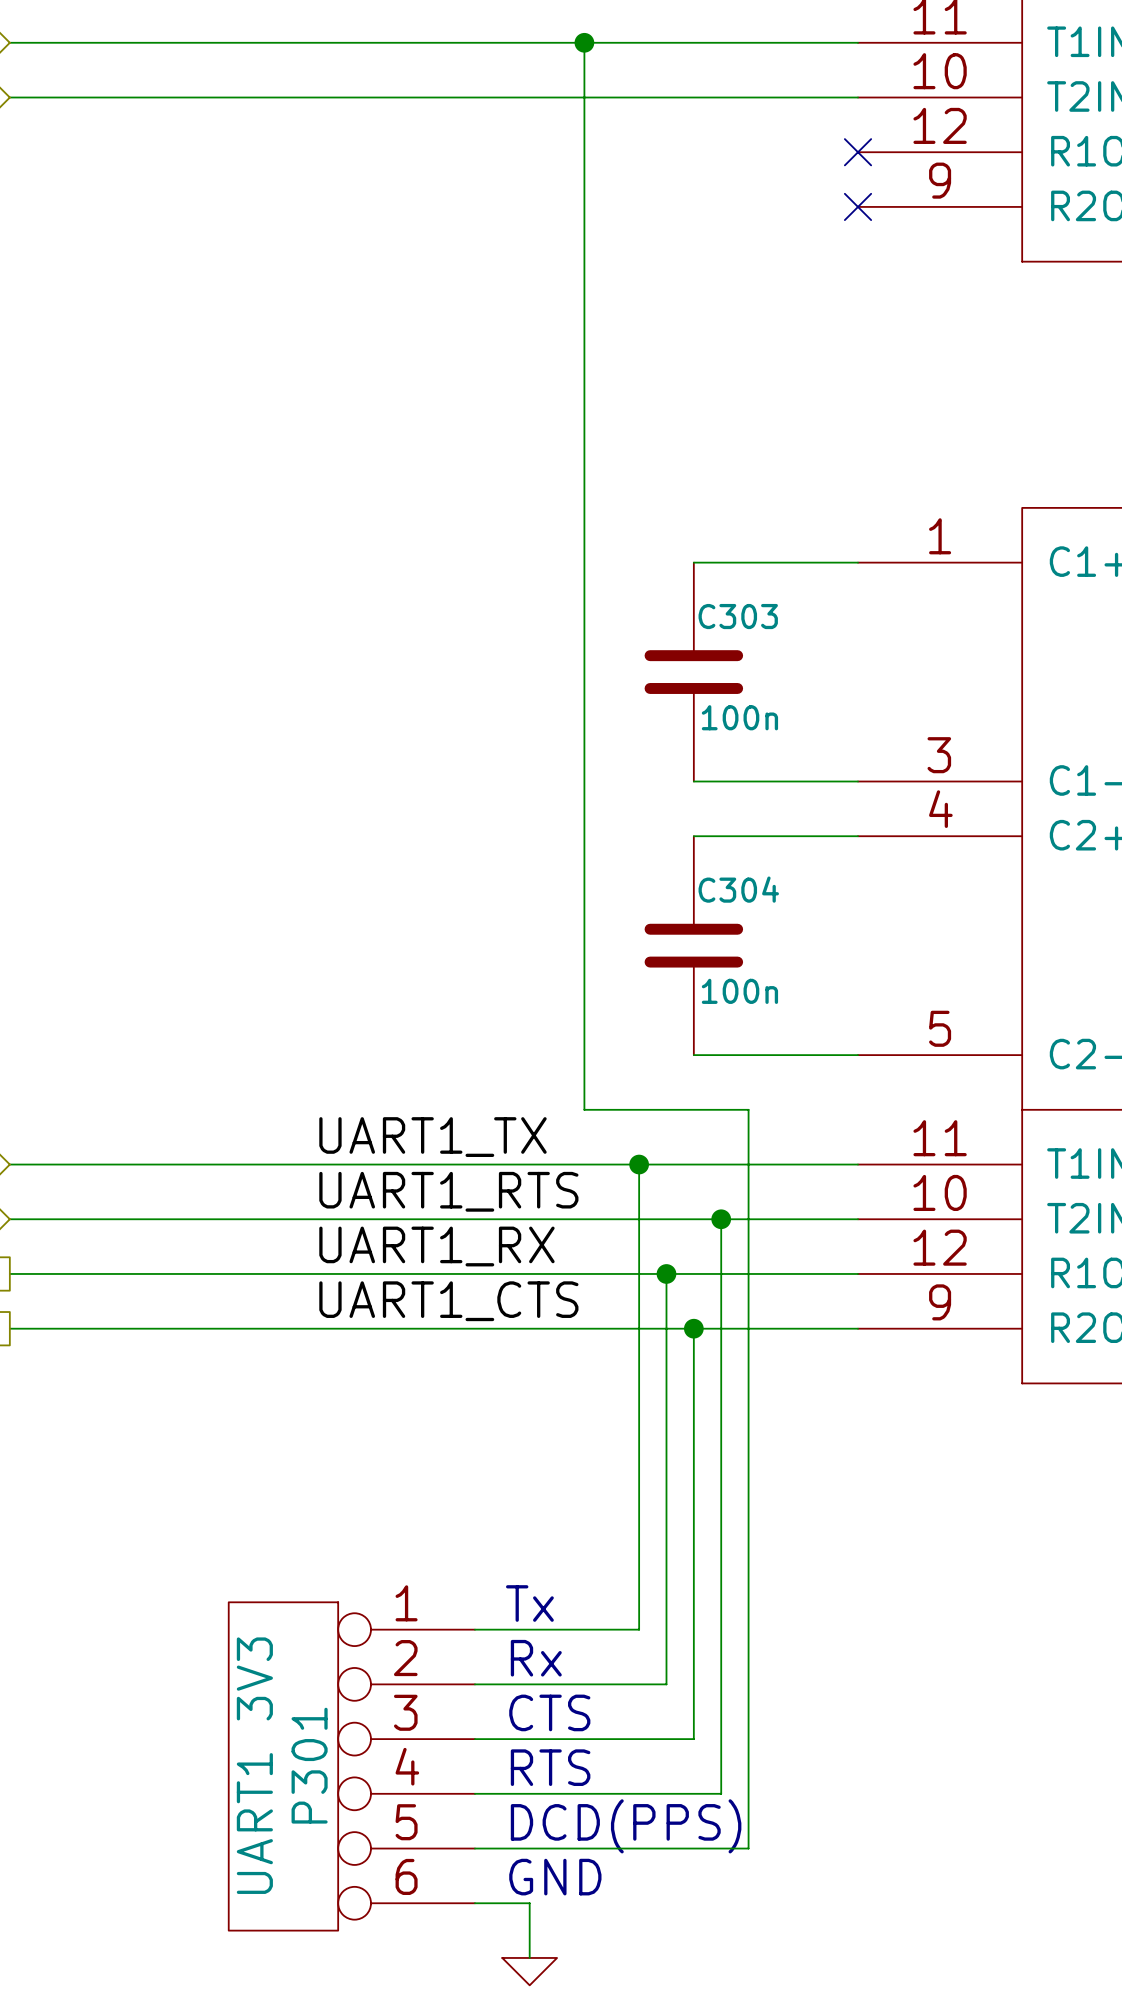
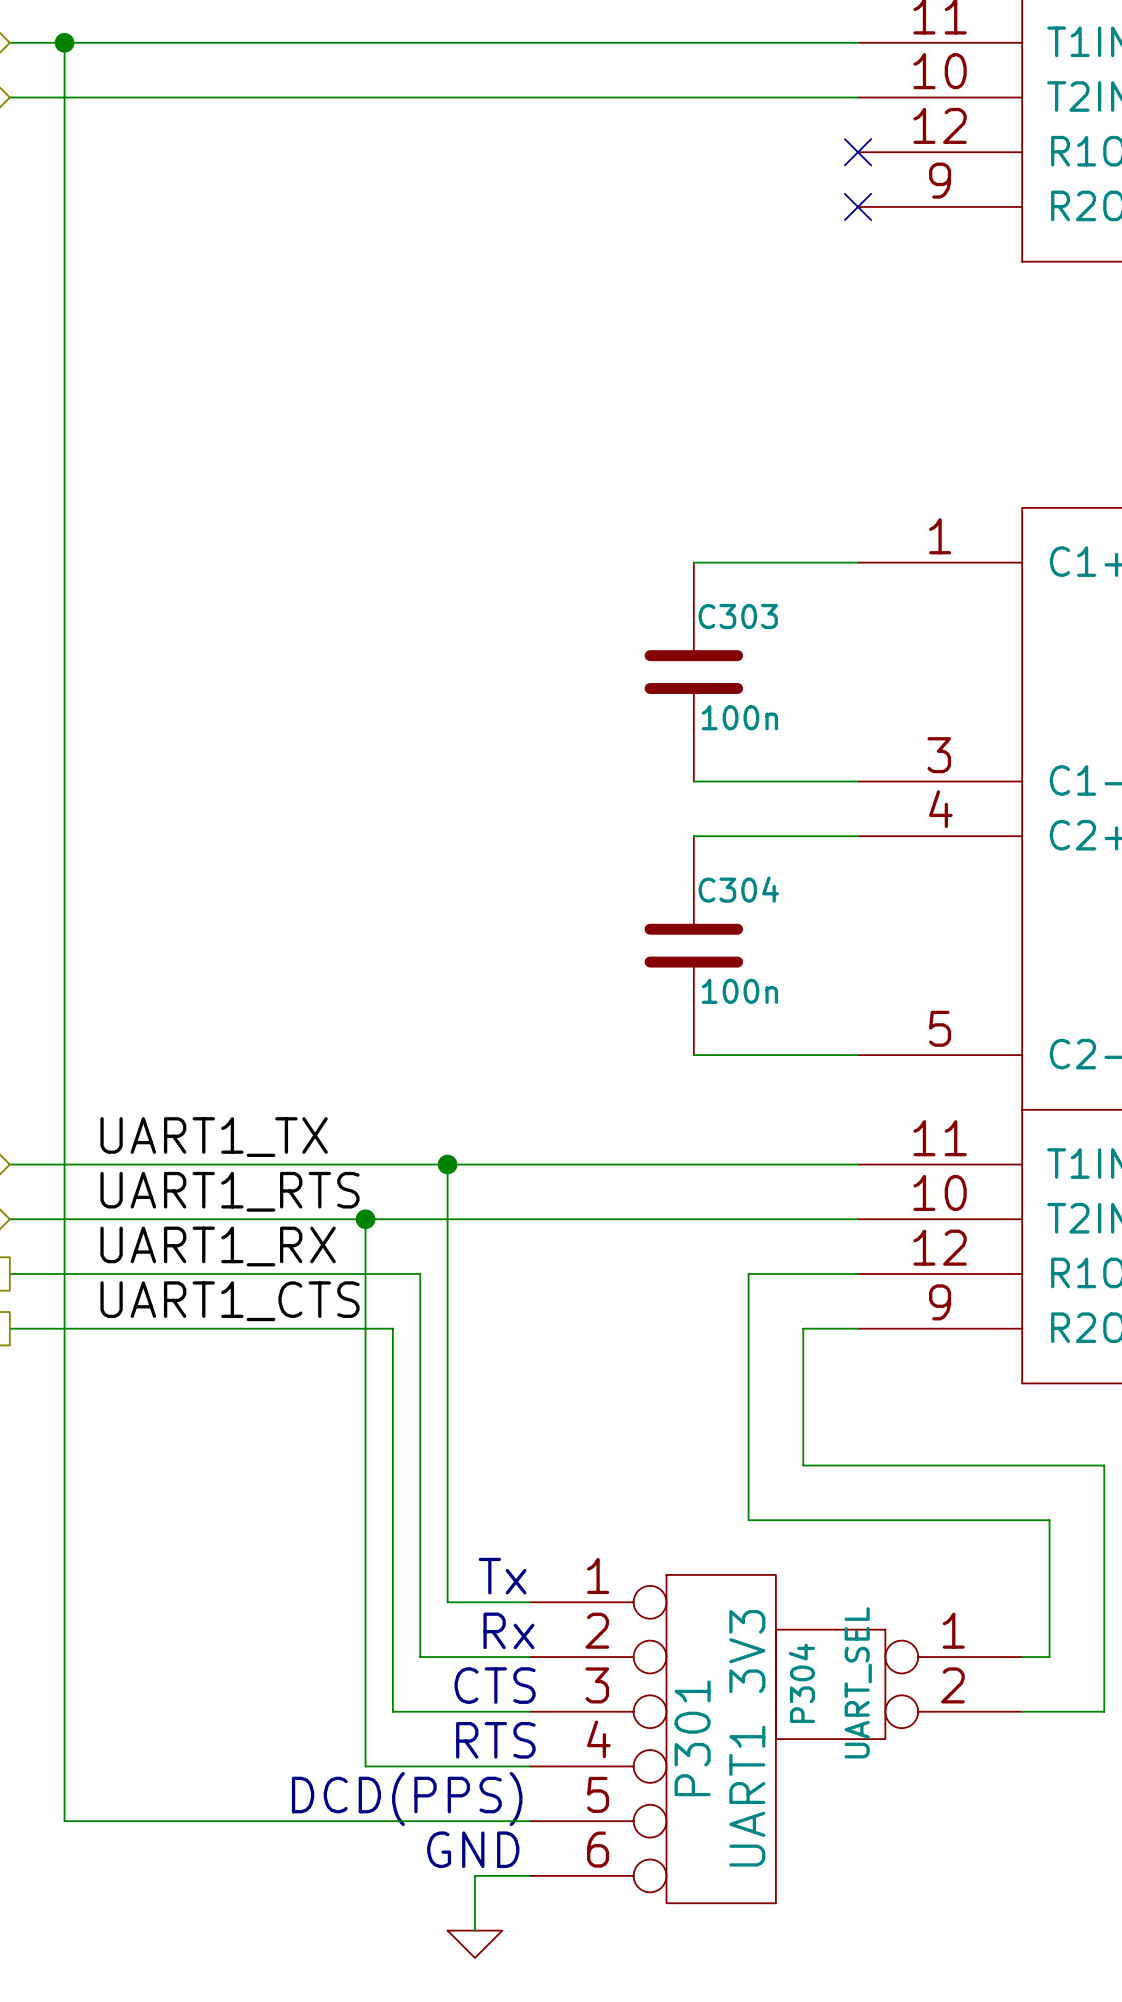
wire: none -> (64, 42) (64, 1821) (529, 1821)
junction: none -> (64, 42)
wire: (584, 42) (584, 1109) (748, 1109) (748, 1273) (420, 1273) -> (529, 1657) (420, 1657) (420, 1273)
junction: (584, 42) -> none
label position: UART1_TX (432, 1137) -> UART1_TX (214, 1137)
wire: none -> (447, 1164) (447, 1602) (529, 1602)
junction: none -> (447, 1164)
wire: (639, 1164) (639, 1629) (474, 1629) -> none
junction: (639, 1164) -> none
label position: UART1_RTS (448, 1191) -> UART1_RTS (229, 1191)
wire: none -> (365, 1219) (365, 1766) (529, 1766)
junction: none -> (365, 1219)
wire: (721, 1219) (721, 1793) (474, 1793) -> none
junction: (721, 1219) -> none
label position: UART1_RX (436, 1246) -> UART1_RX (218, 1246)
wire: (666, 1273) (666, 1684) (474, 1684) -> none
junction: (666, 1273) -> none
label position: UART1_CTS (448, 1301) -> UART1_CTS (229, 1301)
wire: (392, 1328) (803, 1328) -> (392, 1328) (392, 1711) (529, 1711)
wire: (693, 1328) (693, 1739) (474, 1739) -> none
junction: (693, 1328) -> none
wire: none -> (803, 1328) (803, 1465) (1104, 1465) (1104, 1711) (1022, 1711)
wire: (748, 1520) (748, 1848) (474, 1848) -> (748, 1520) (1049, 1520) (1049, 1657) (1022, 1657)
text position: Tx (529, 1603) -> Tx (502, 1576)
text position: Rx (536, 1658) -> Rx (508, 1630)
P304: none -> UART_SEL (899, 1684)
text position: CTS (549, 1712) -> CTS (495, 1685)
P301 flip: as is (283, 1766) -> left-right (721, 1739)
P301 position: (351, 1766) -> (652, 1739)
text position: RTS (550, 1767) -> RTS (495, 1740)
text position: DCD(PPS) (626, 1826) -> DCD(PPS) (407, 1798)
wire: none -> (529, 1875) (474, 1875) (474, 1930)
text position: GND (555, 1877) -> GND (473, 1849)
wire: (474, 1903) (529, 1903) (529, 1957) -> none
power symbol position: (529, 1971) -> (474, 1944)

